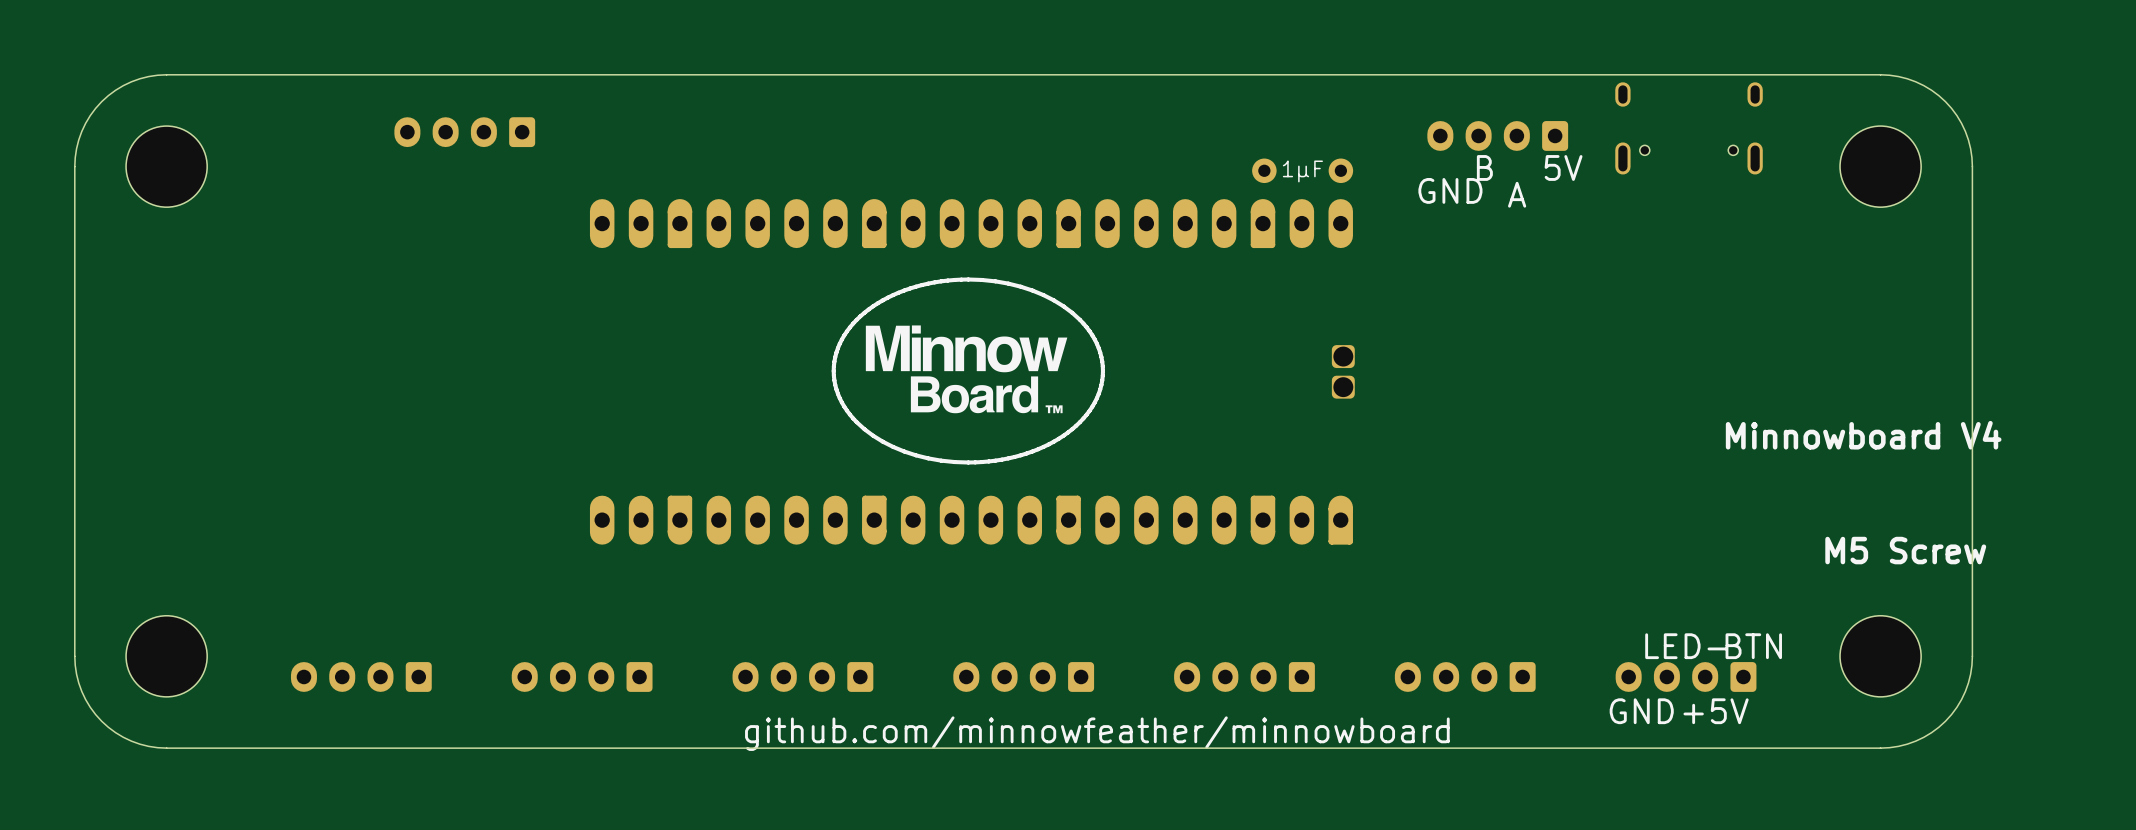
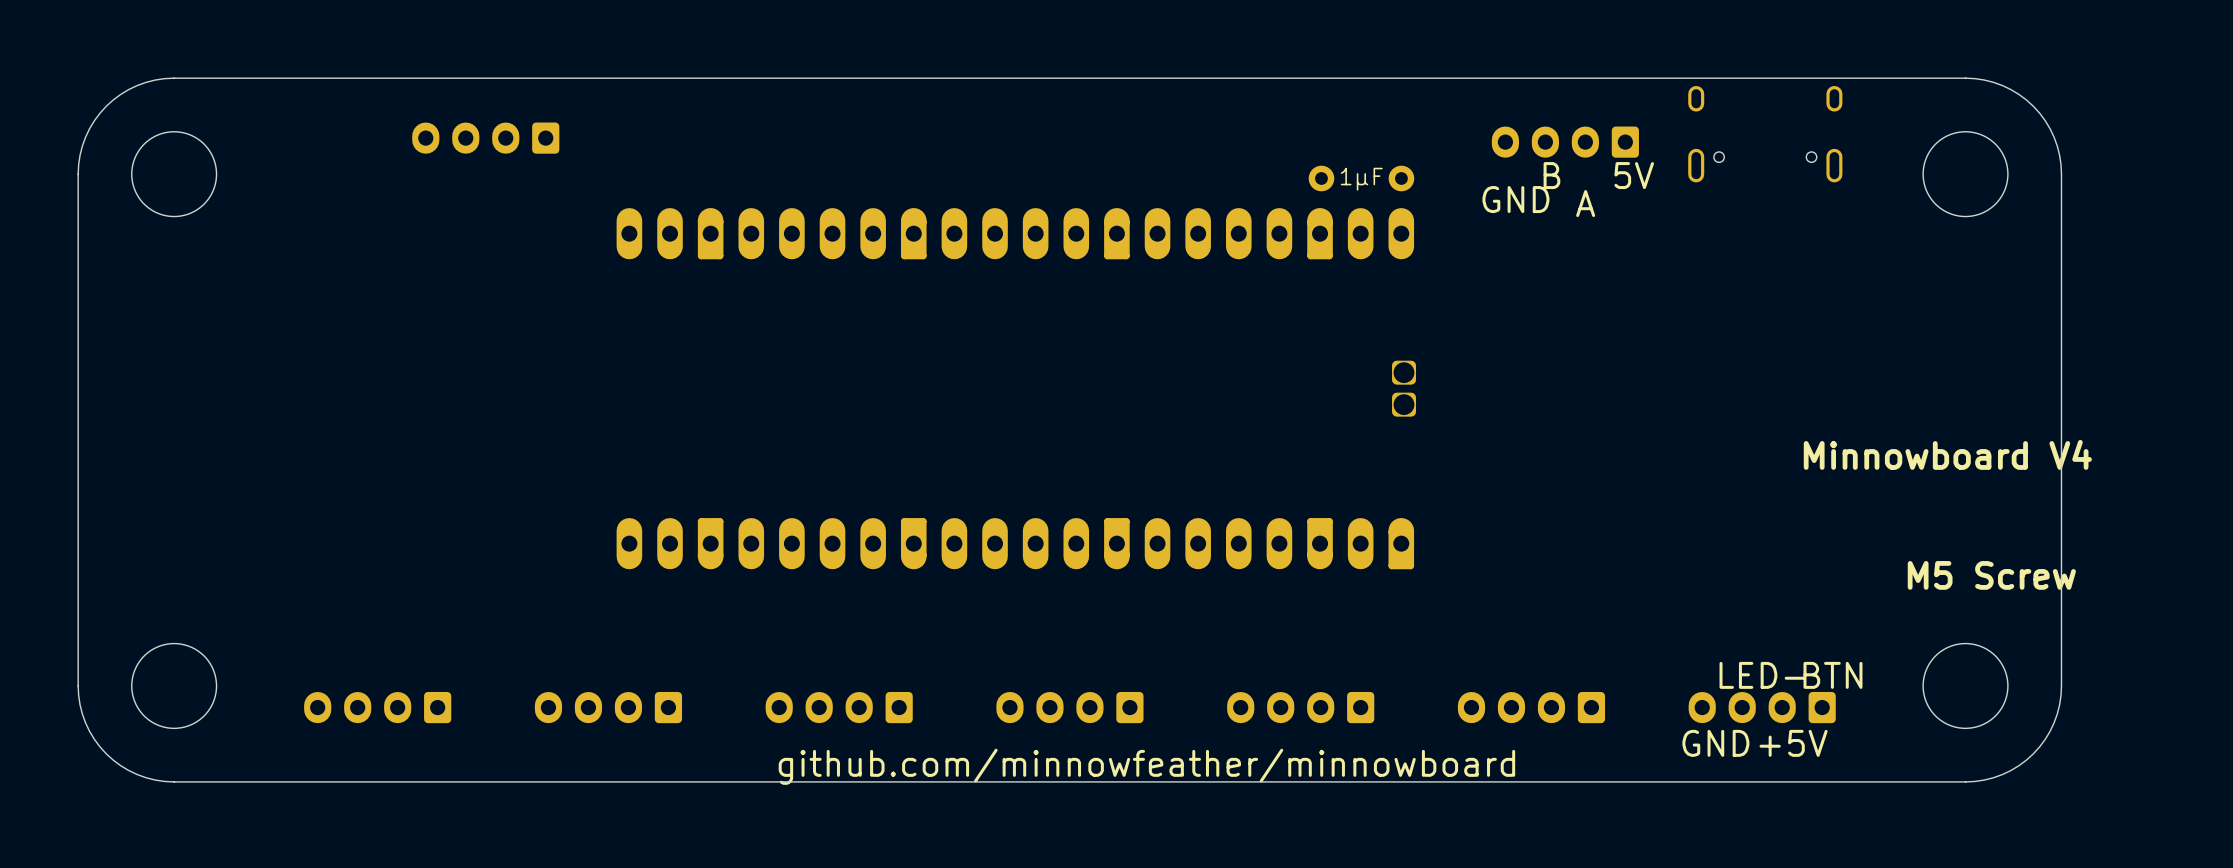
line: (968, 279) (941, 281) (909, 288) (882, 300) (860, 316) (844, 335) (836, 352) (833, 371) (837, 393) (846, 410) (864, 429) (893, 446) (915, 455) (941, 460) (975, 462) (1008, 458) (1038, 449) (1072, 429) (1092, 406) (1100, 389) (1102, 375) (1102, 361) (1098, 348) (1083, 323) (1072, 312) (1053, 300) (1032, 290) (1008, 283) (968, 279) -> none
drawing: [865, 325, 1068, 414] -> none

